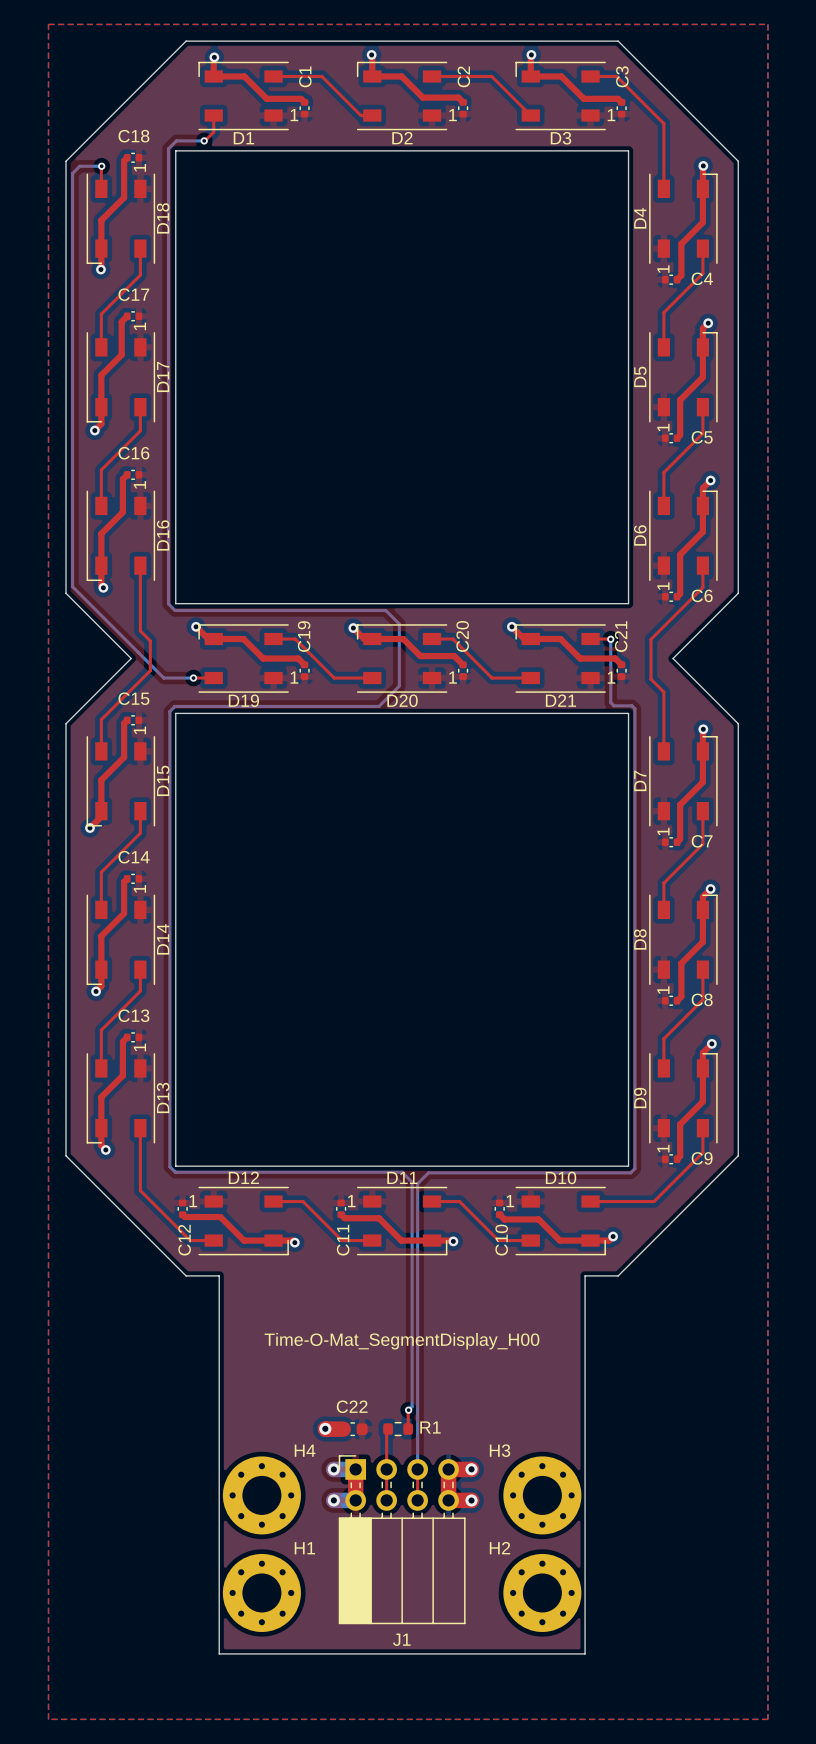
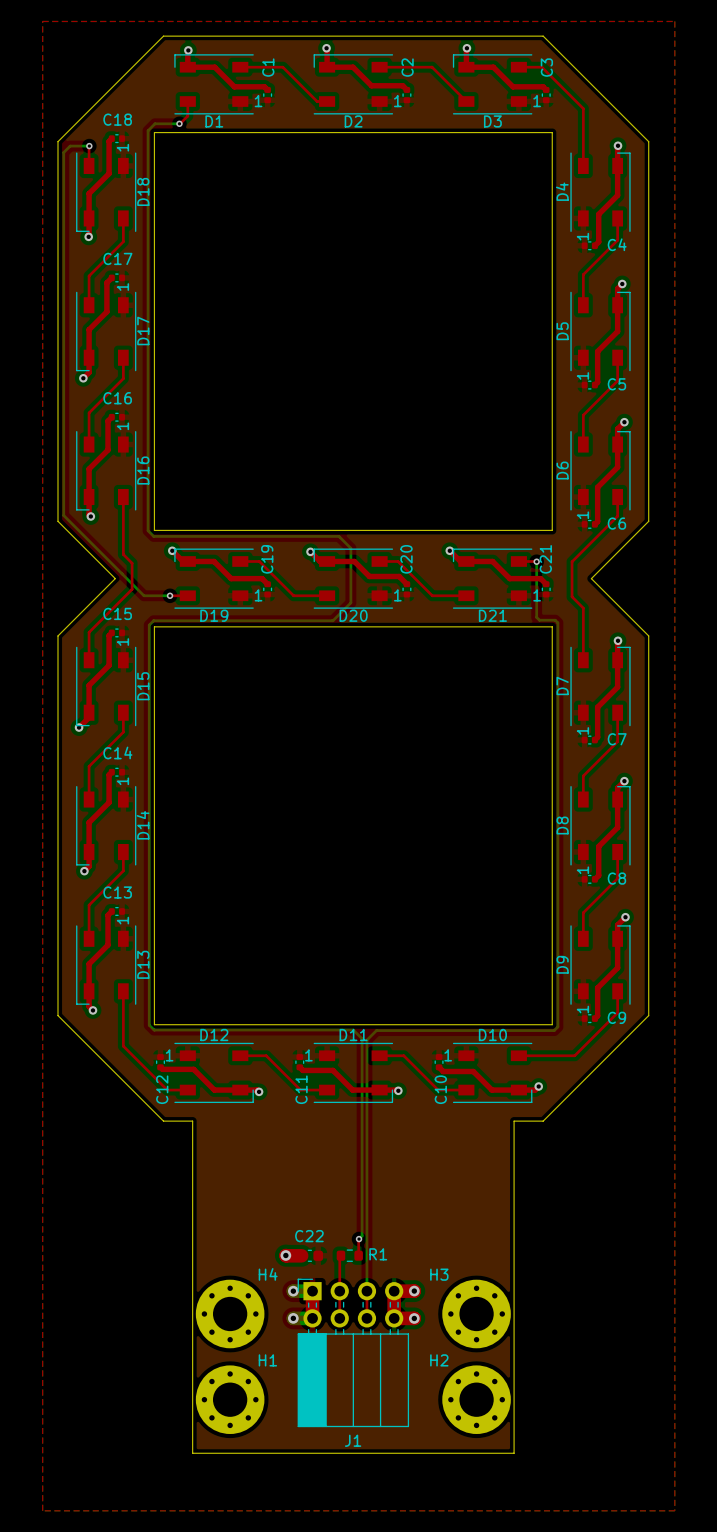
text: Time-O-Mat_SegmentDisplay_H00 (401, 1341) -> none

